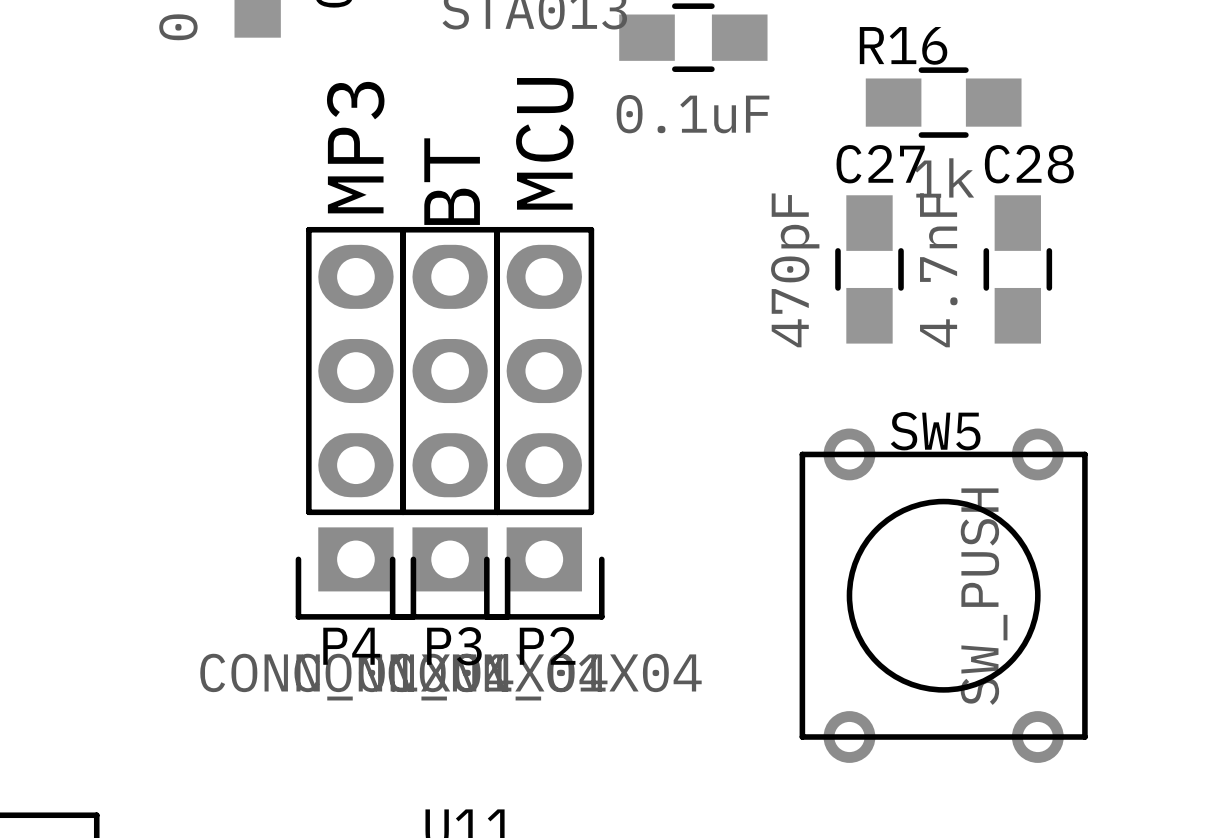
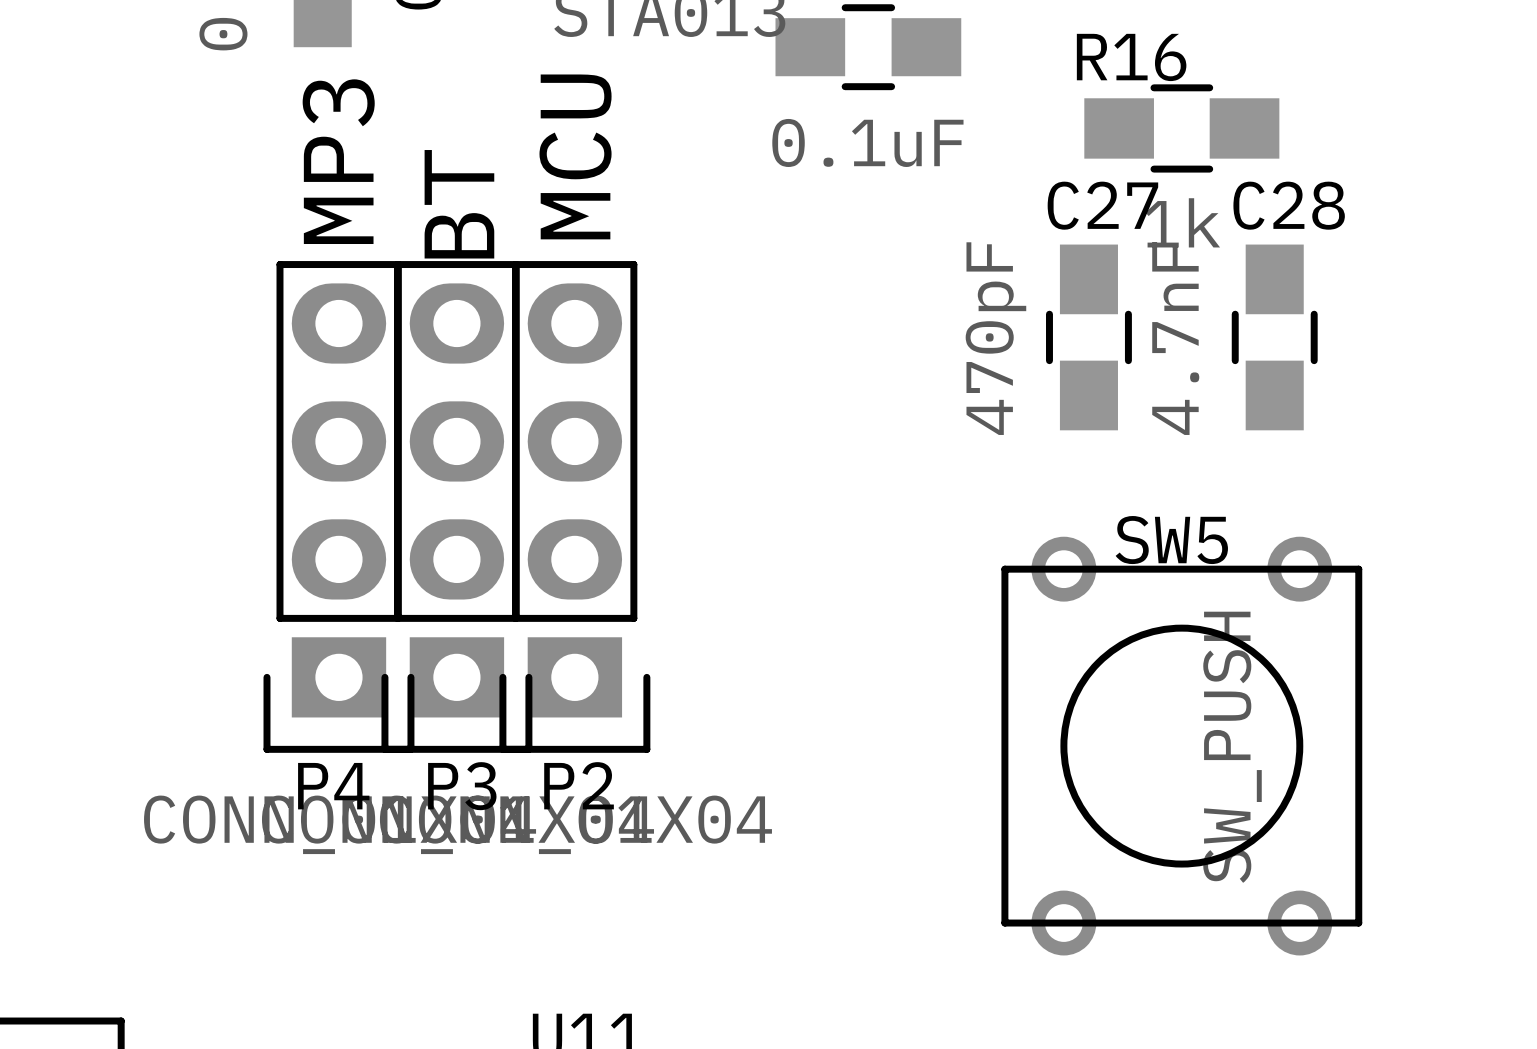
text: none -> MP3 (338, 161)
text position: MCU (544, 143) -> MCU (575, 156)
text: MP3 (355, 147) -> BT (459, 204)
text: BT (452, 181) -> none
P4 position: (355, 423) -> (338, 506)
P3 position: (450, 423) -> (456, 506)
P2 position: (544, 423) -> (574, 506)

